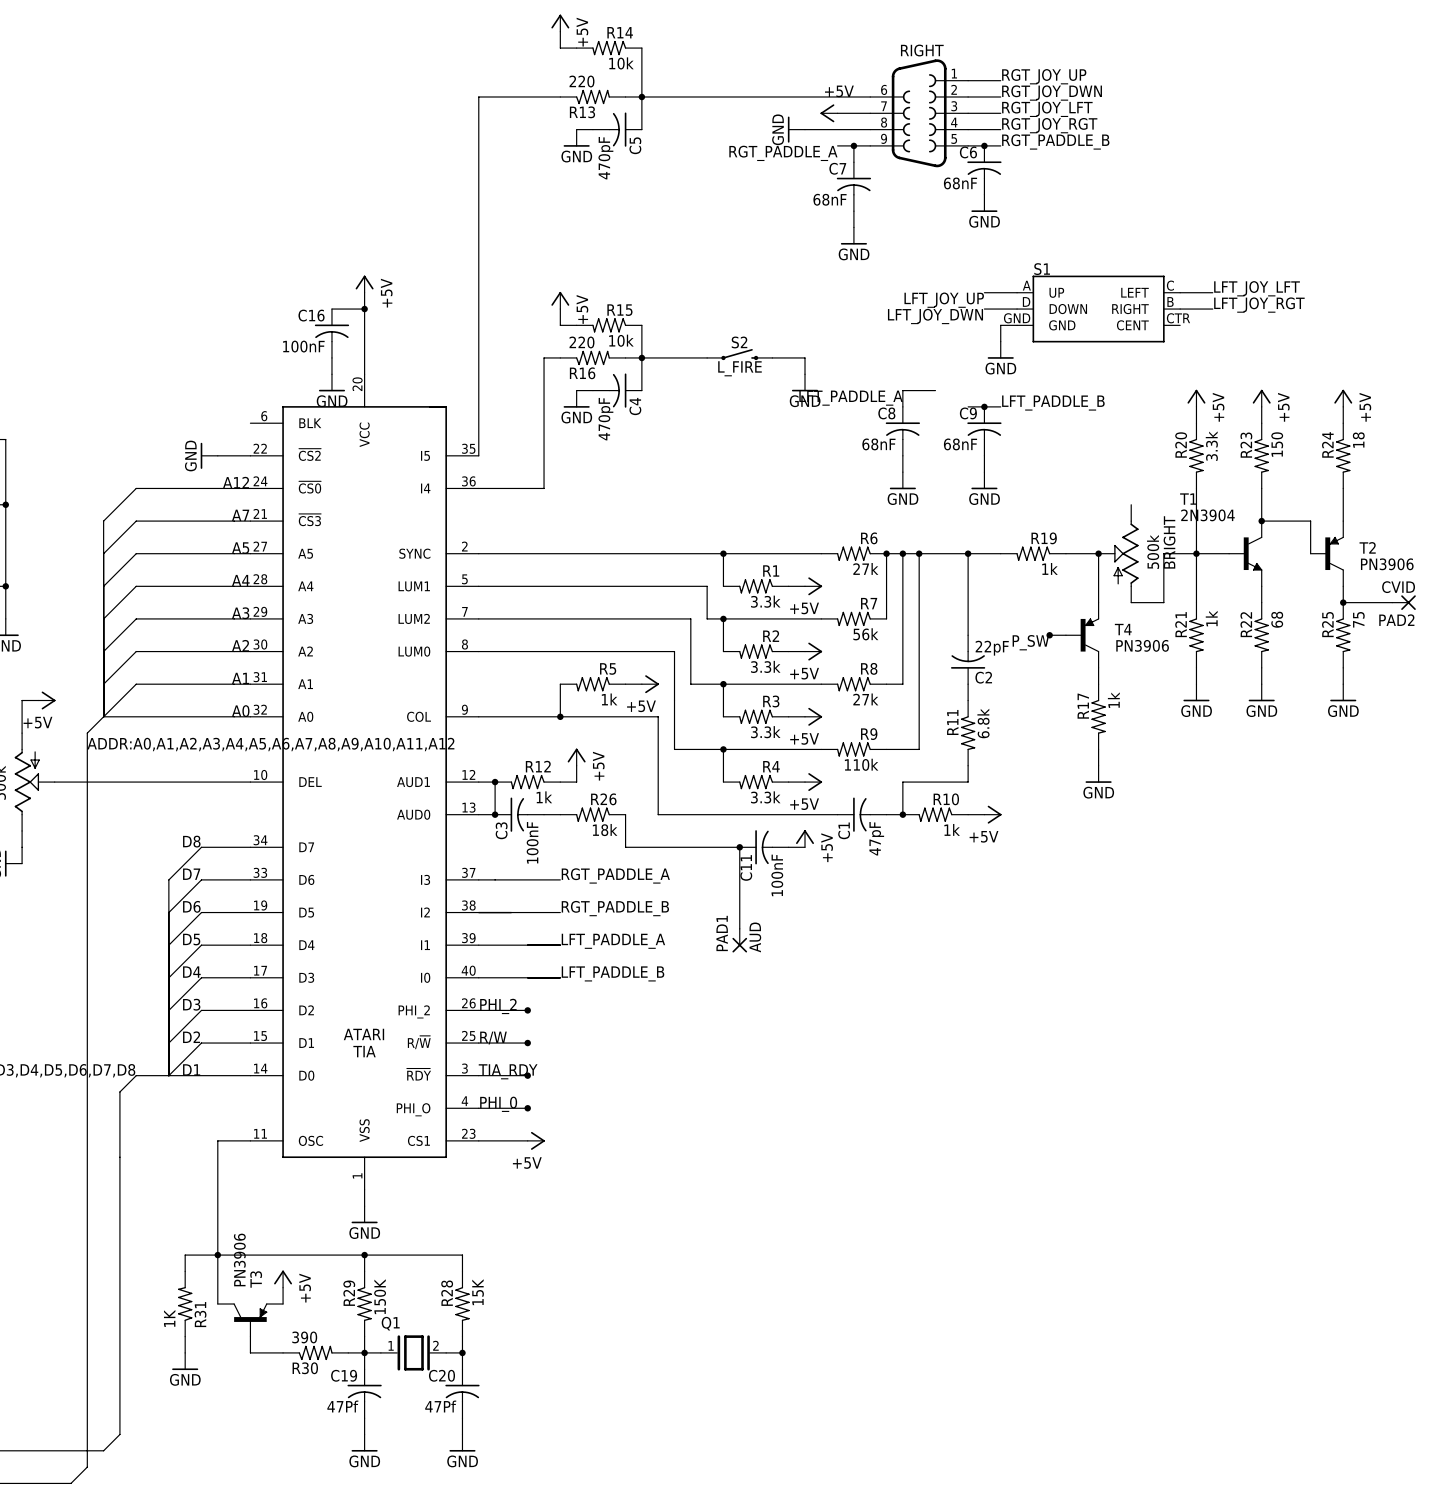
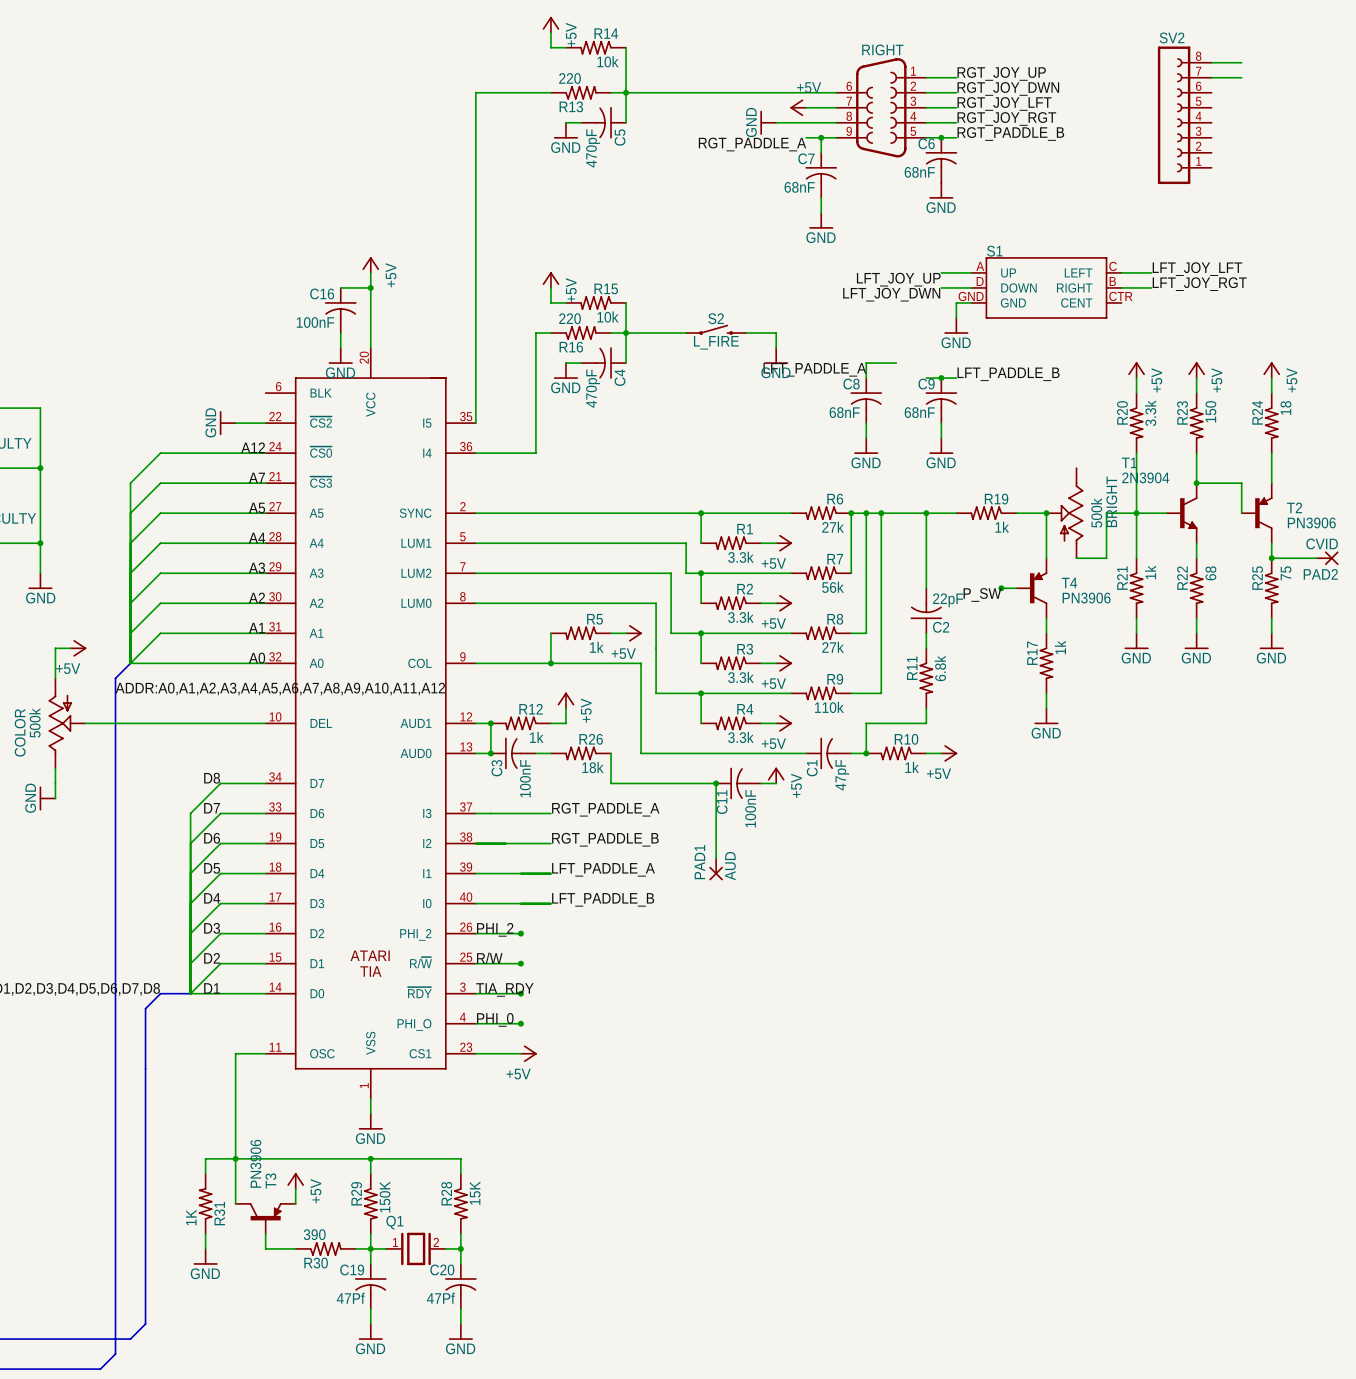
wire: none -> (1211, 62) (1241, 62)
wire: none -> (1211, 77) (1241, 77)
SV2: none -> (1184, 115)

